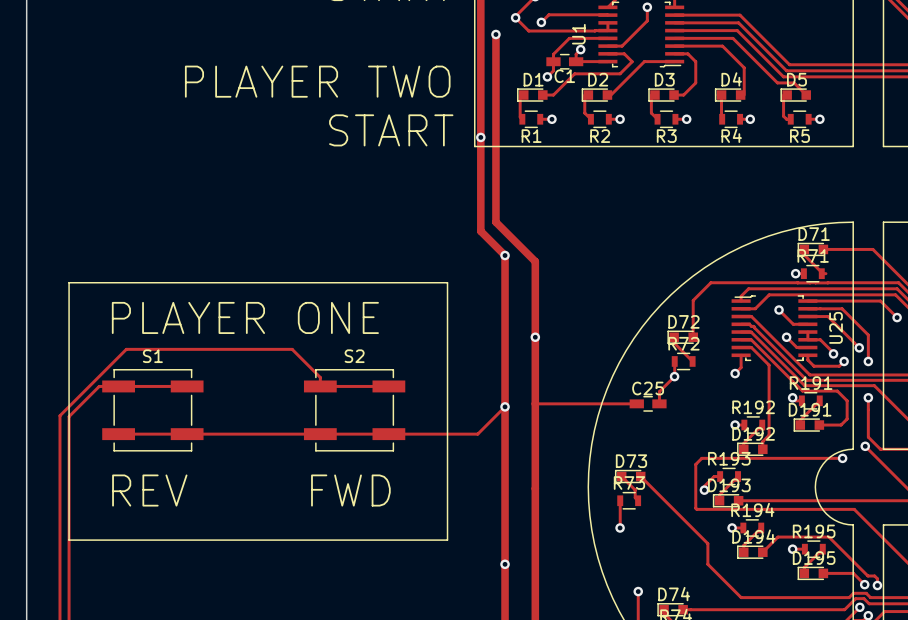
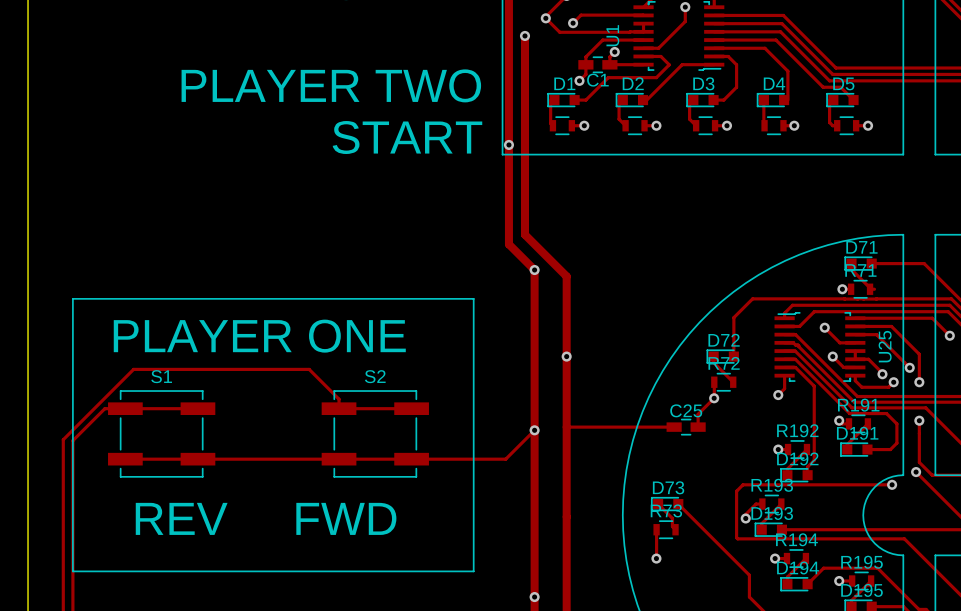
R4 name: R4 (731, 135) -> none
R1 name: R1 (531, 136) -> none
R2 name: R2 (600, 136) -> none
R3 name: R3 (666, 136) -> none
R5 name: R5 (799, 136) -> none

